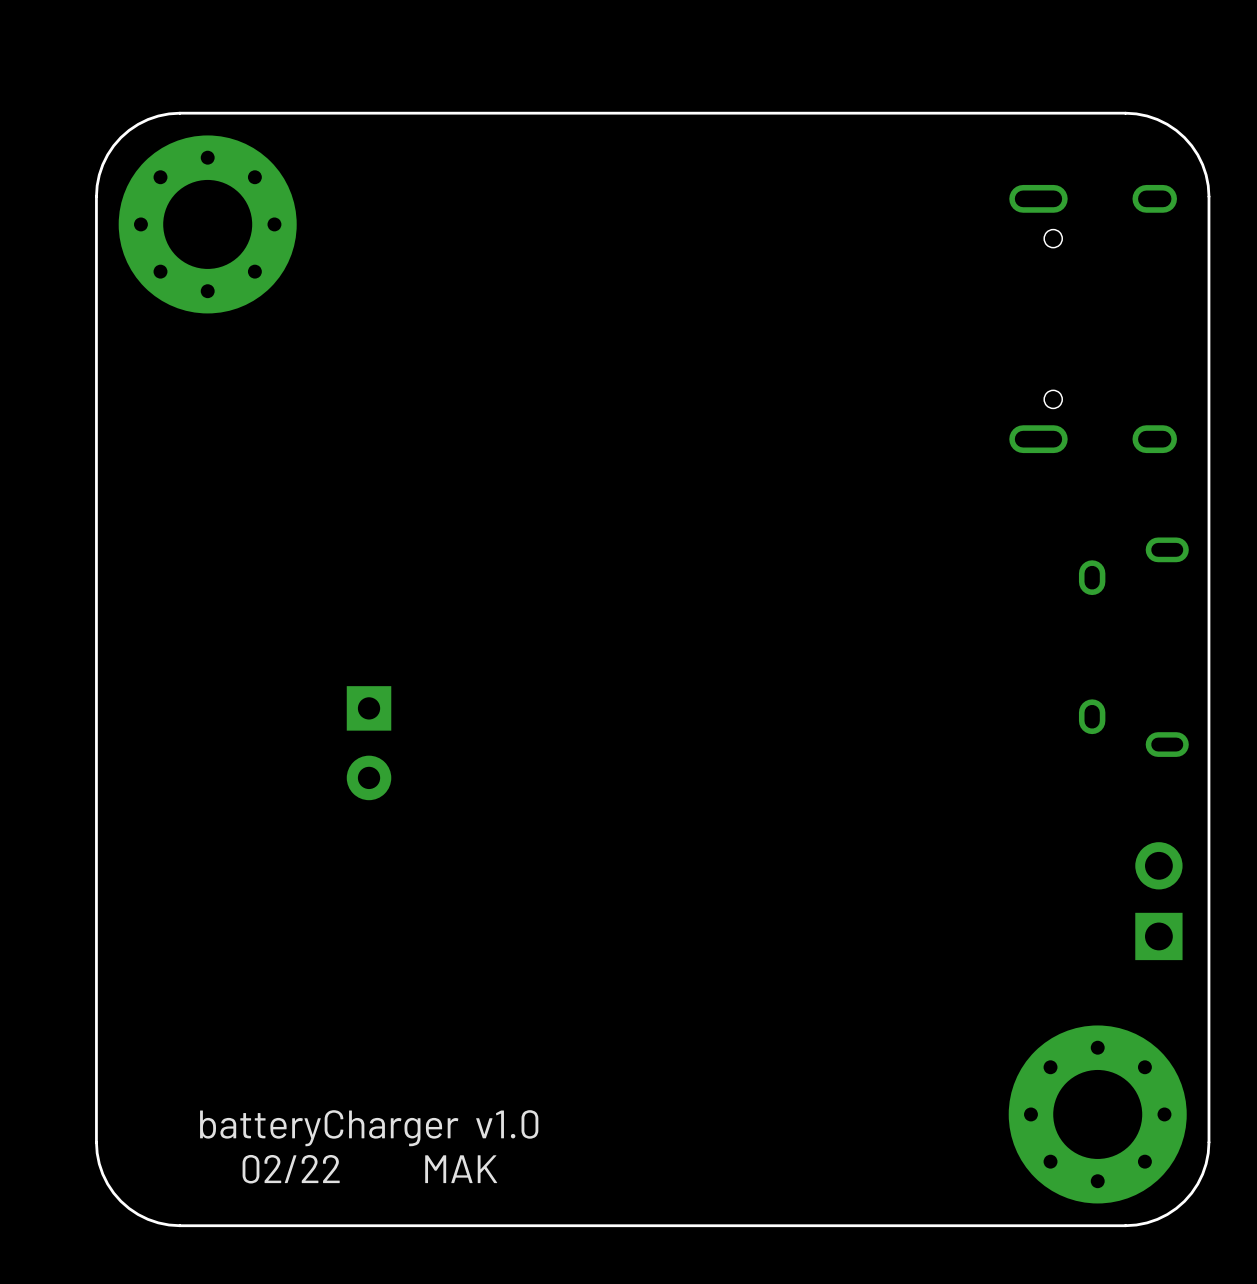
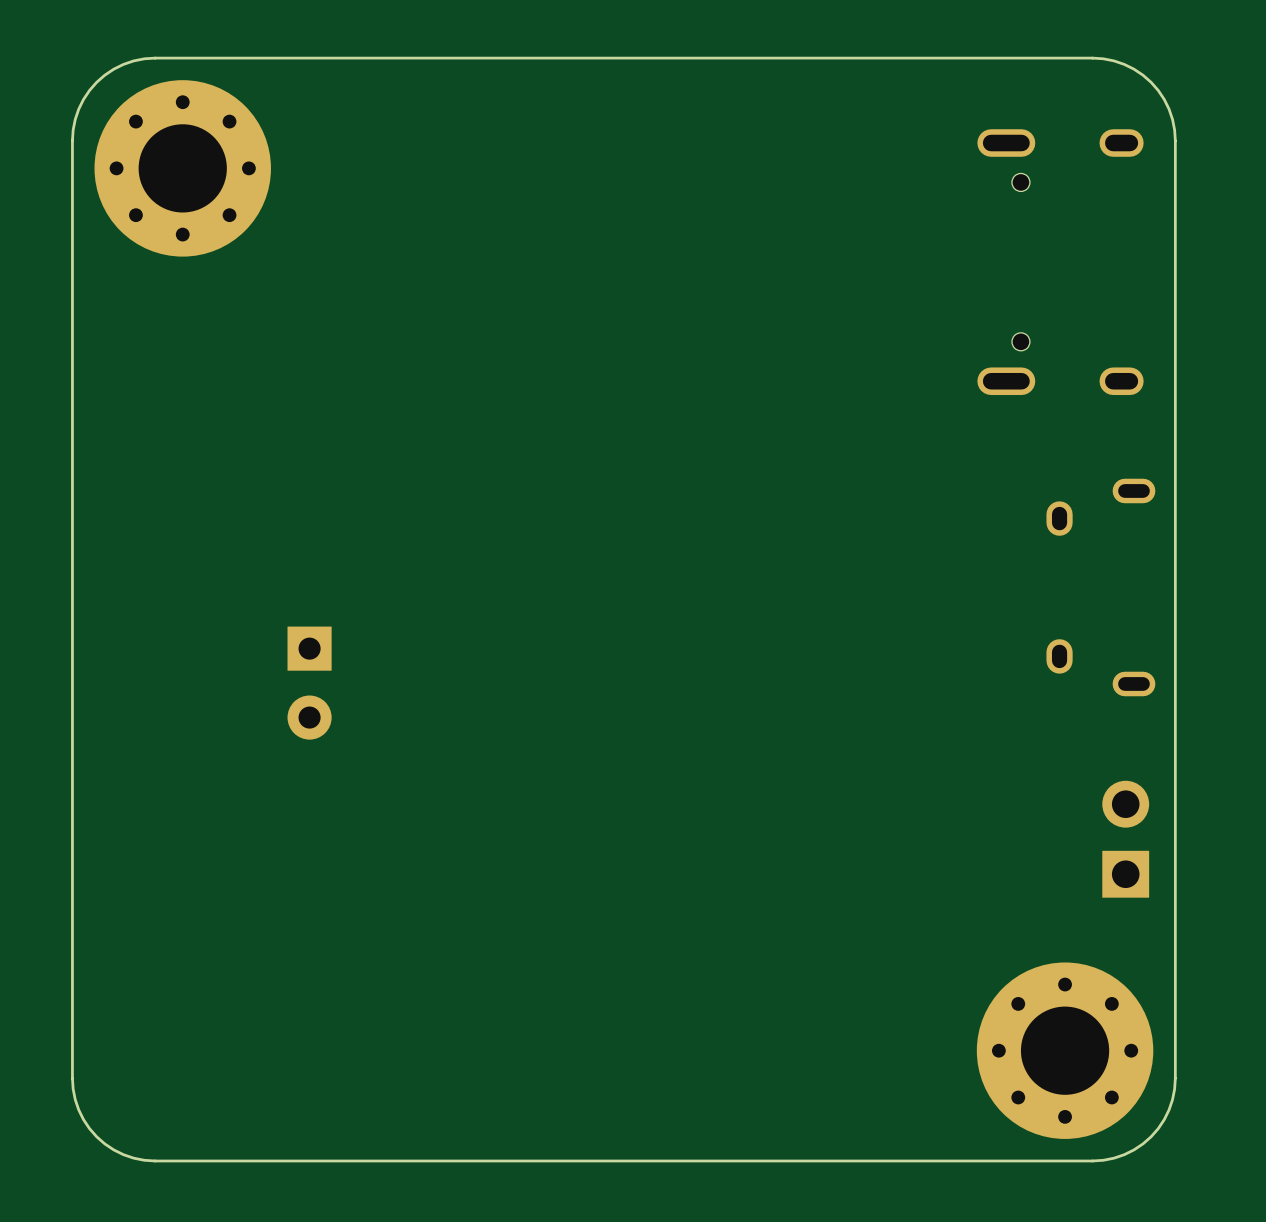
part position: (369, 743) -> (309, 683)
text: batteryCharger v1.0 (369, 1128) -> none
text: 02/22 MAK (369, 1169) -> none

